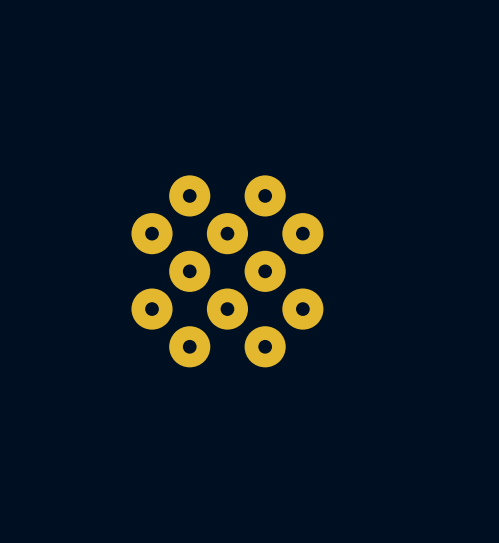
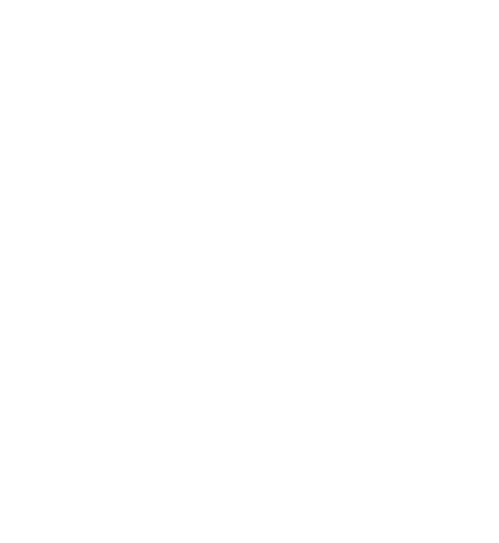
part: (227, 271) -> none

